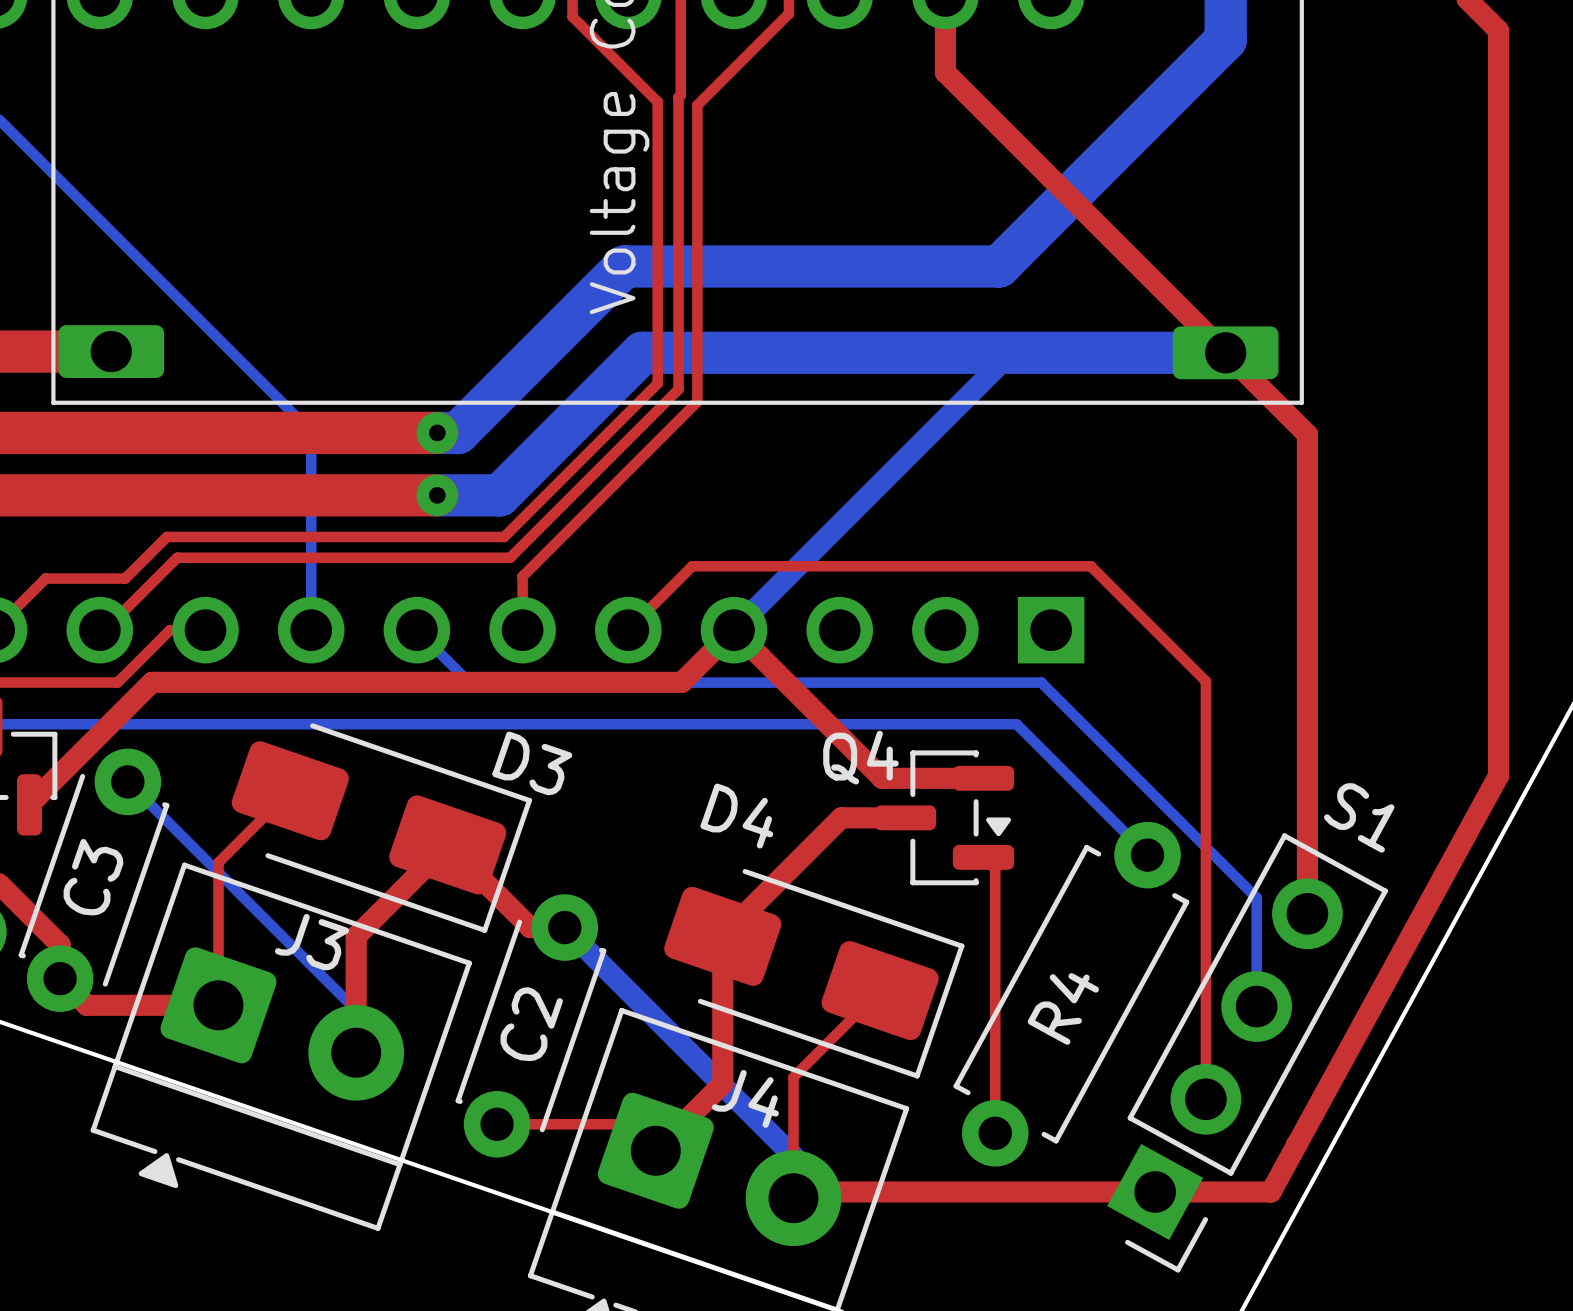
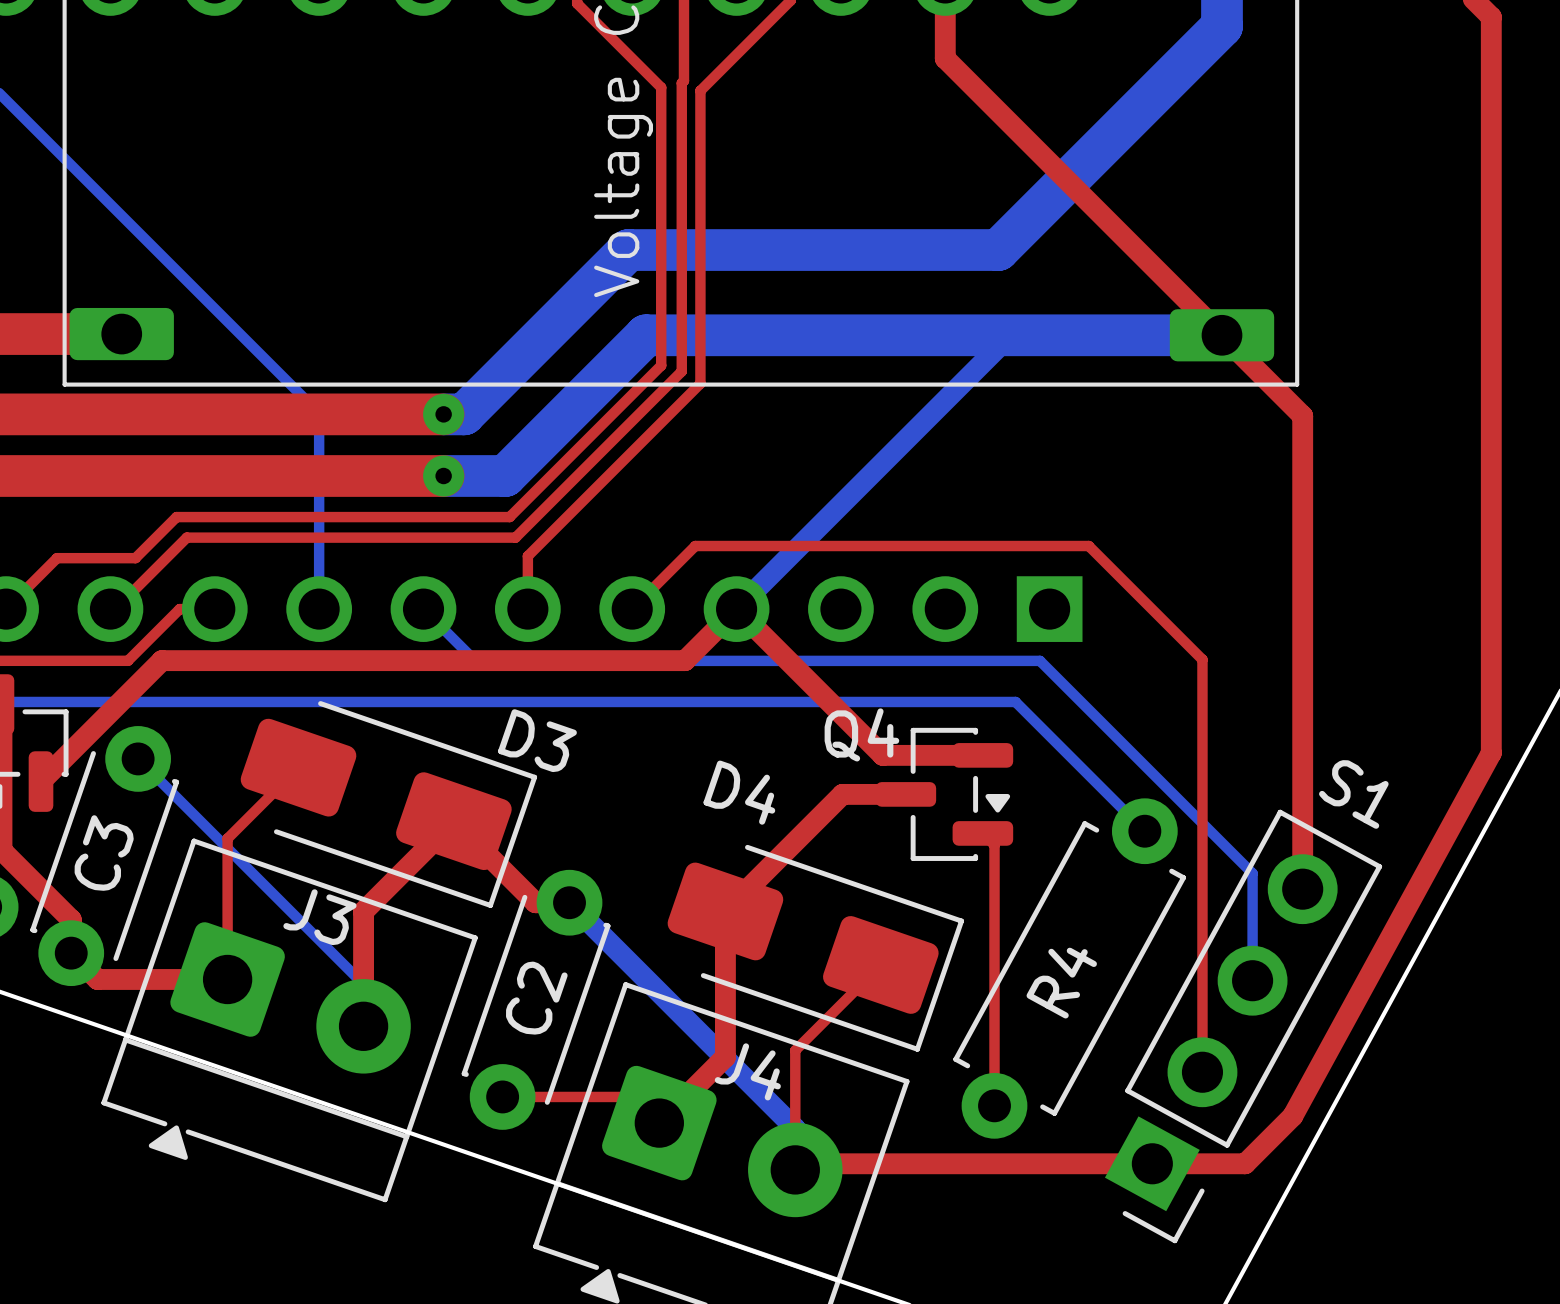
top track: (1296, 1145) (1271, 1191) (1249, 1191) -> (1292, 1116) (1245, 1163)

